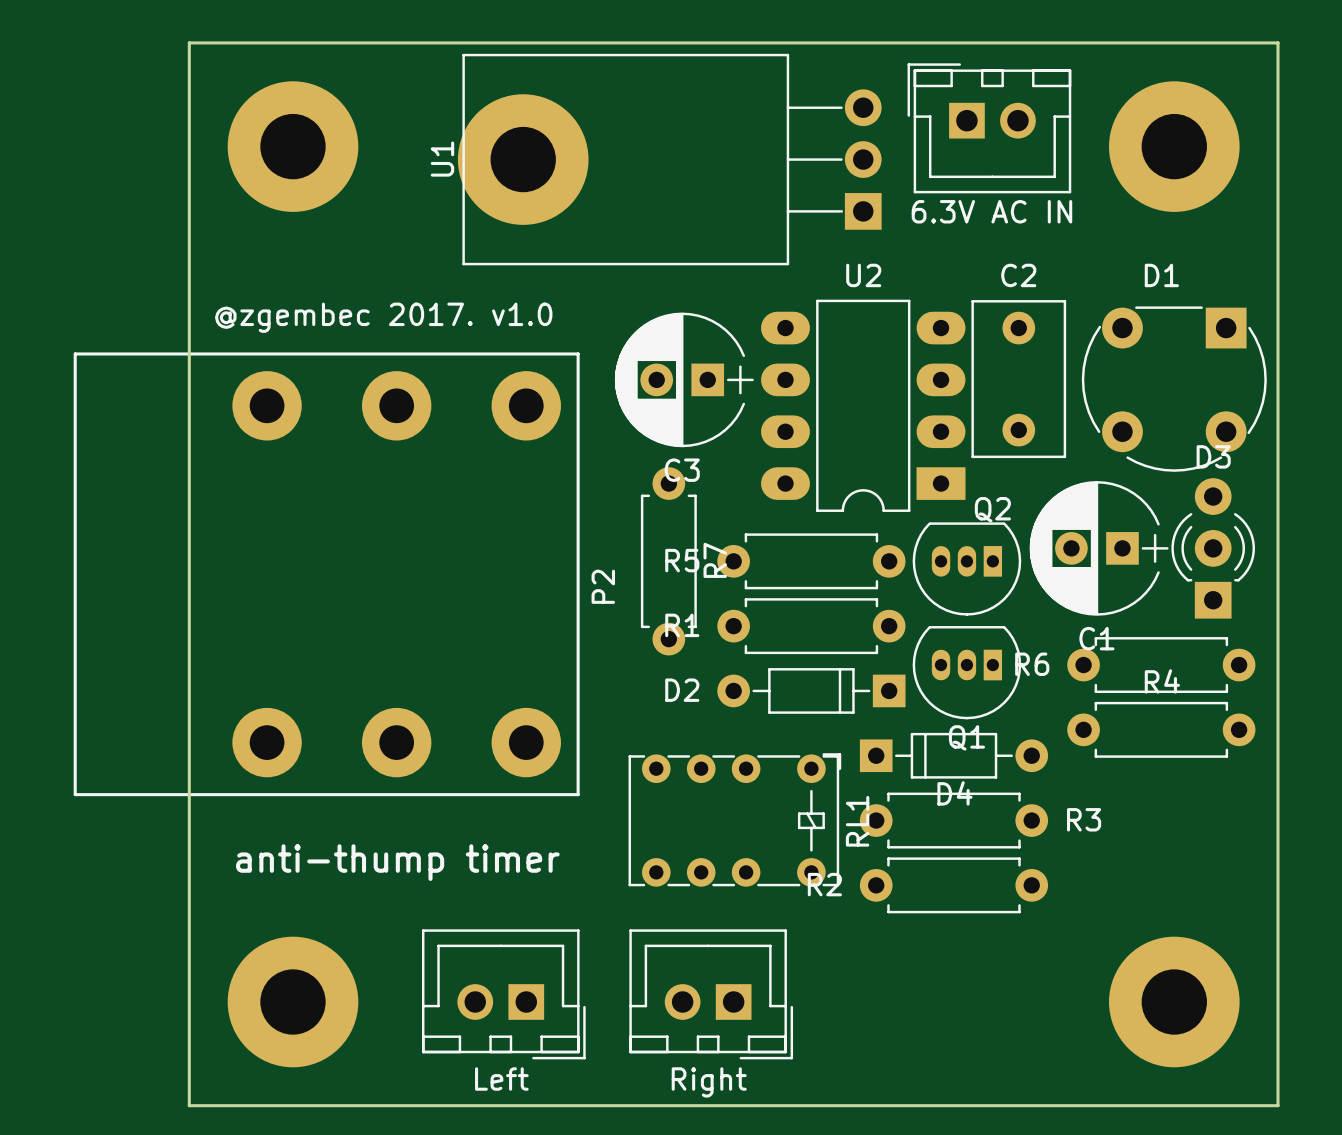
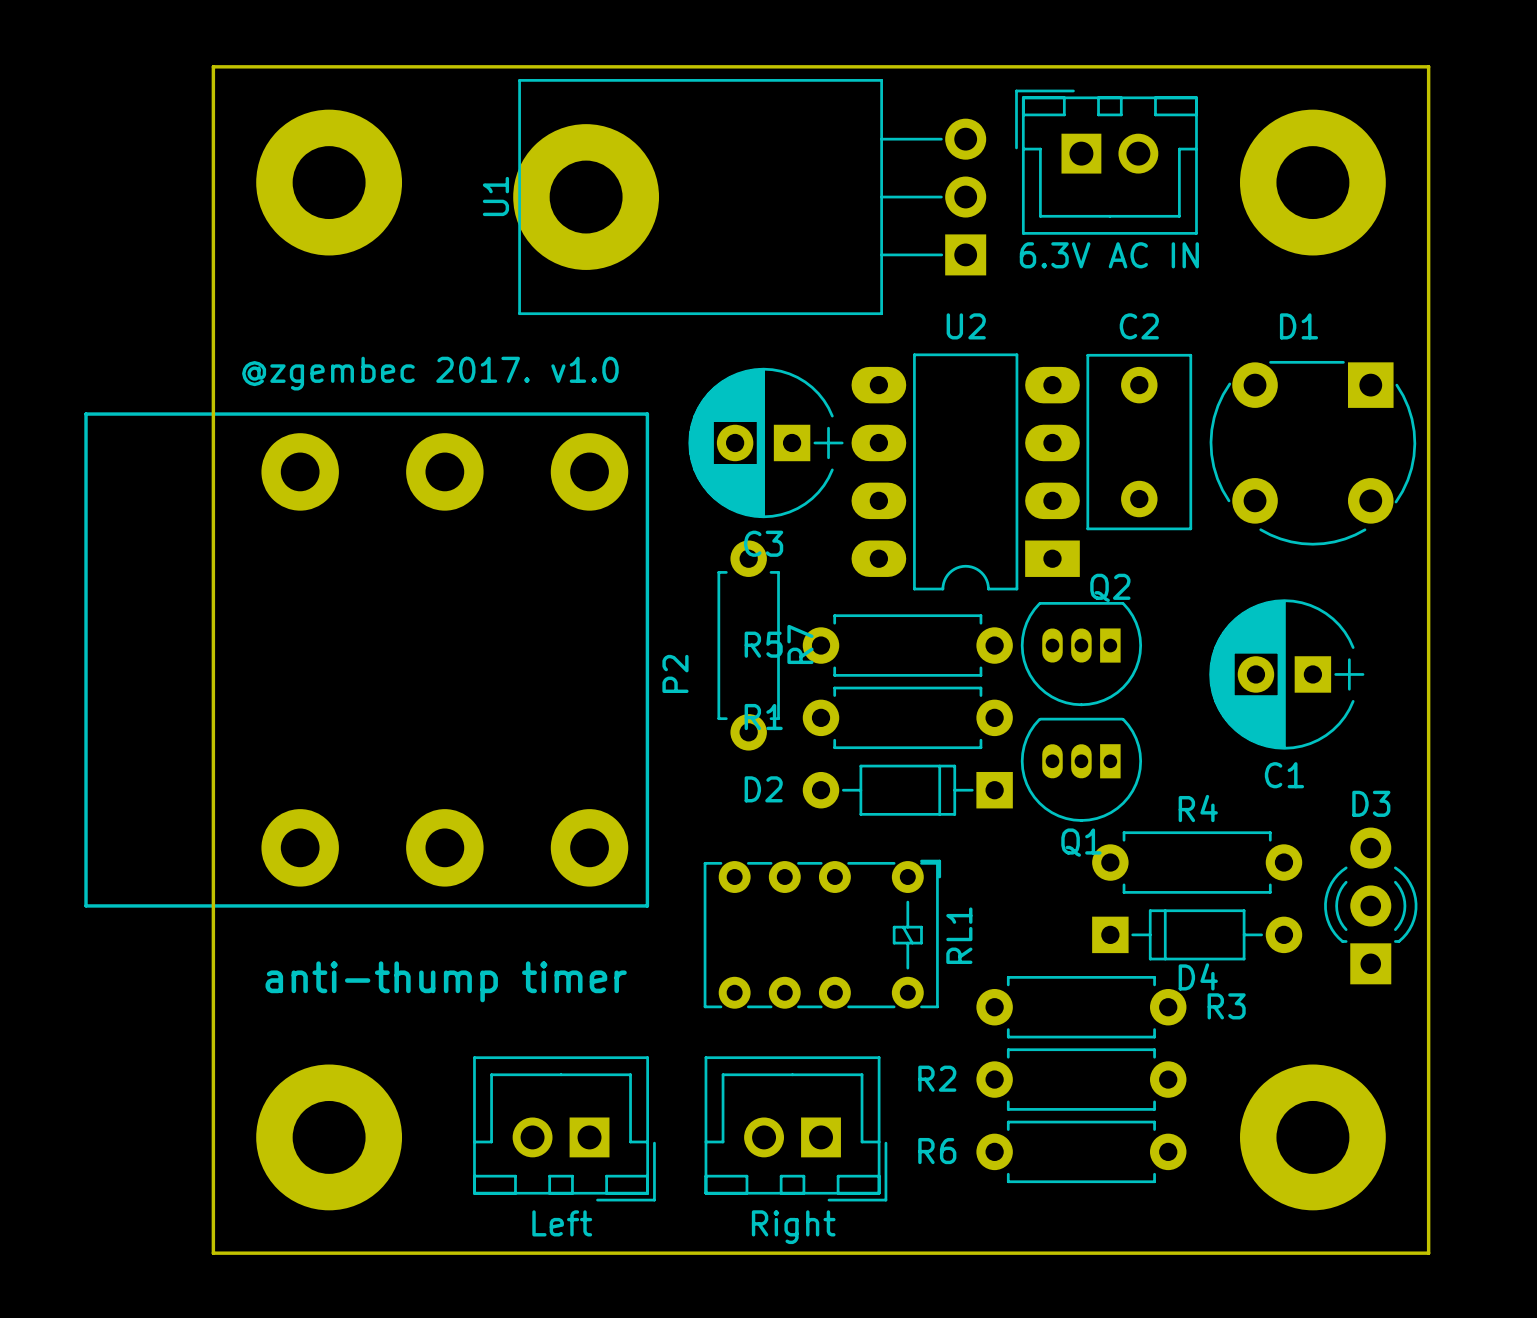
D3 footprint: [1171, 478, 1255, 619] -> [1324, 827, 1418, 985]
C1 position: (1099, 548) -> (1286, 674)
R6 position: (1161, 665) -> (1081, 1151)
R4 position: (1161, 729) -> (1197, 862)
D4 position: (953, 755) -> (1197, 934)
R3 position: (953, 820) -> (1081, 1007)
R2 position: (953, 885) -> (1081, 1079)

